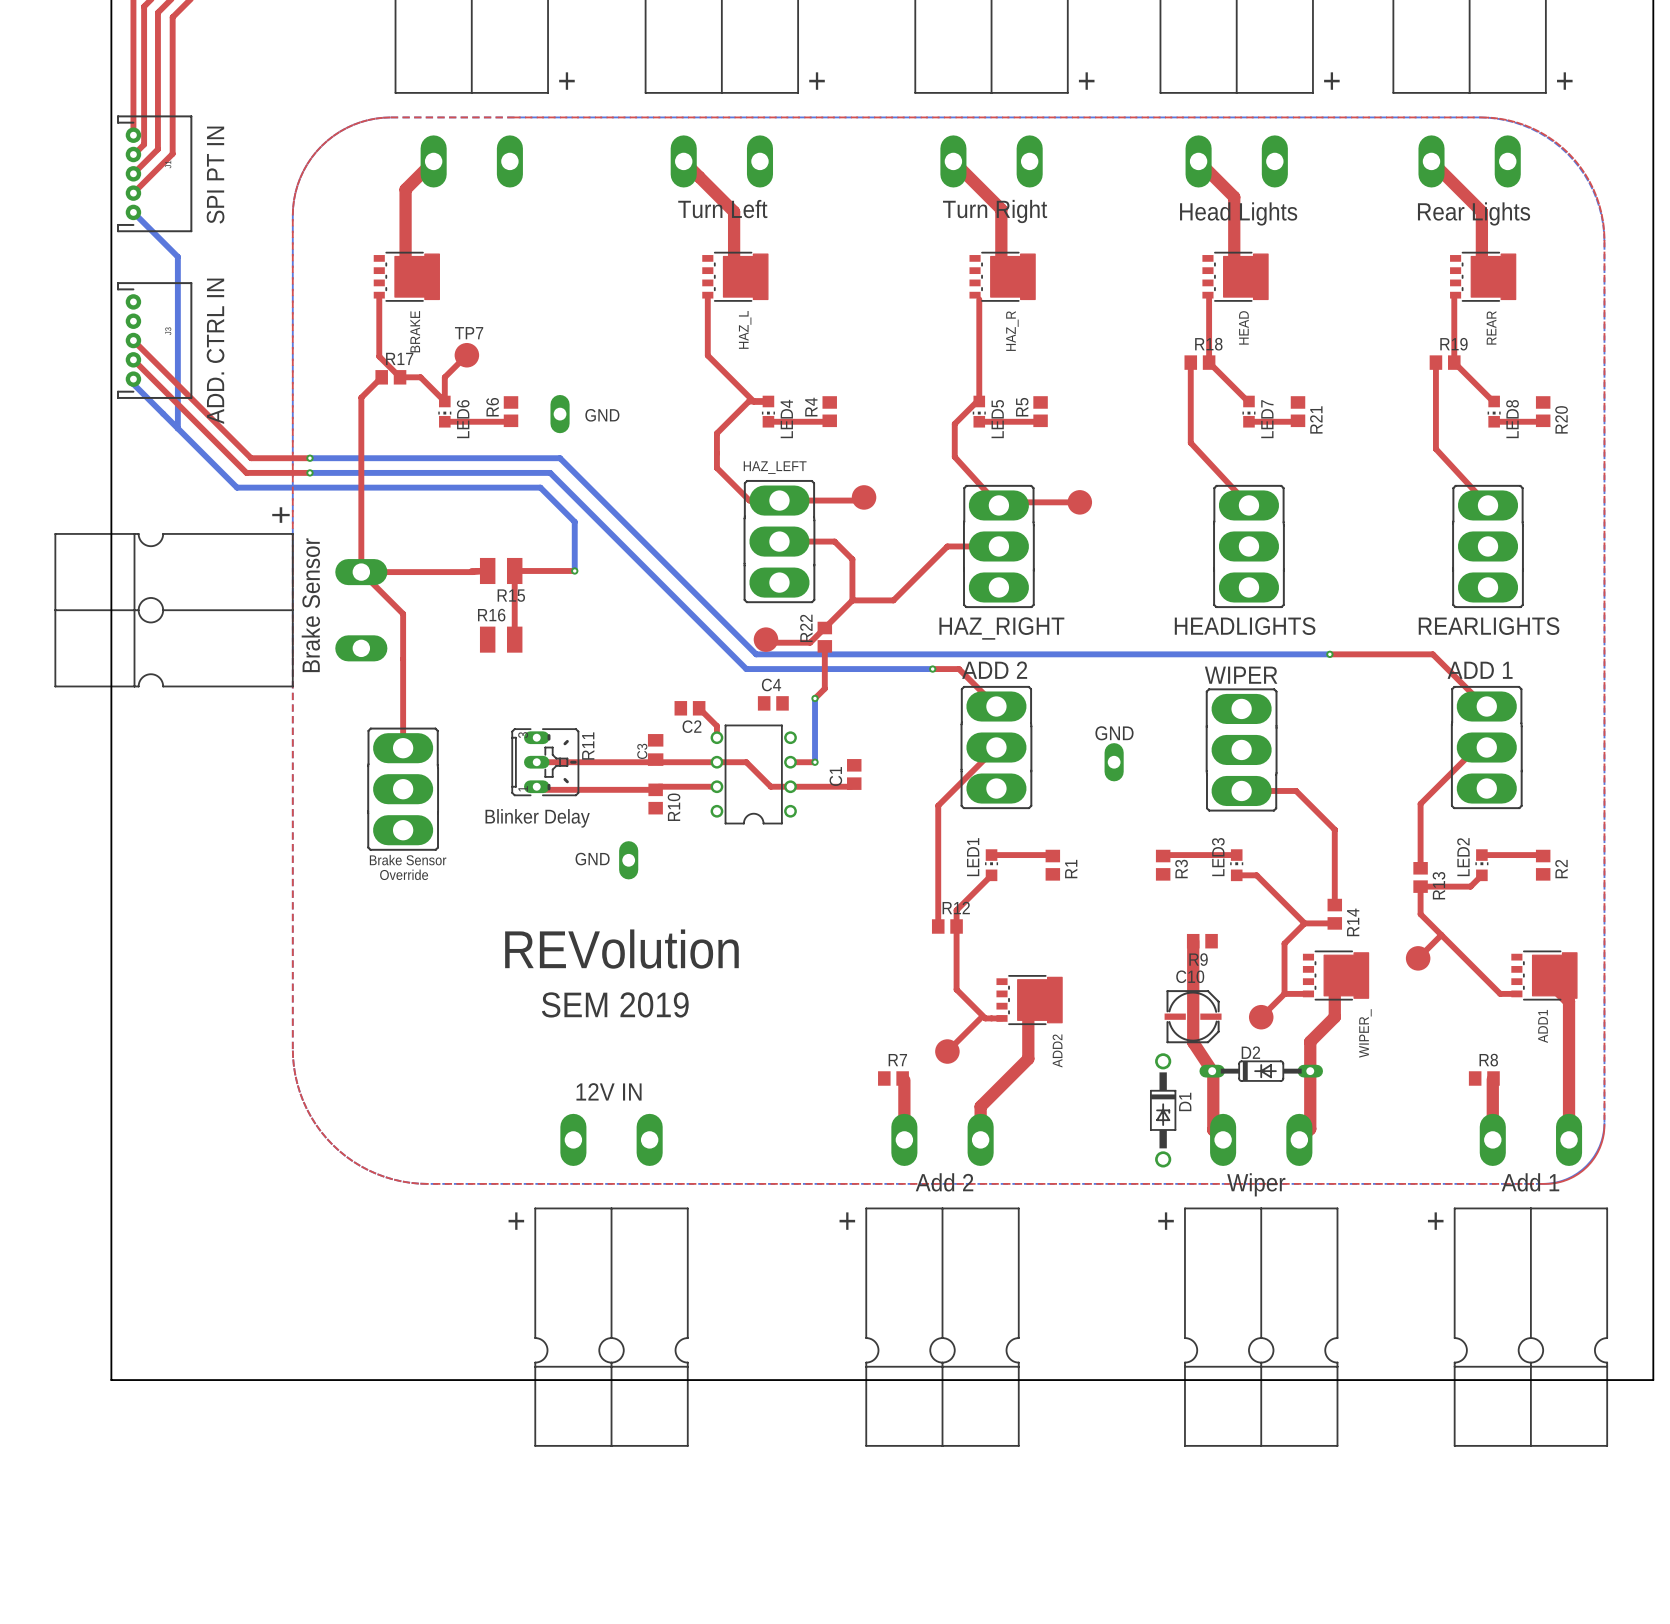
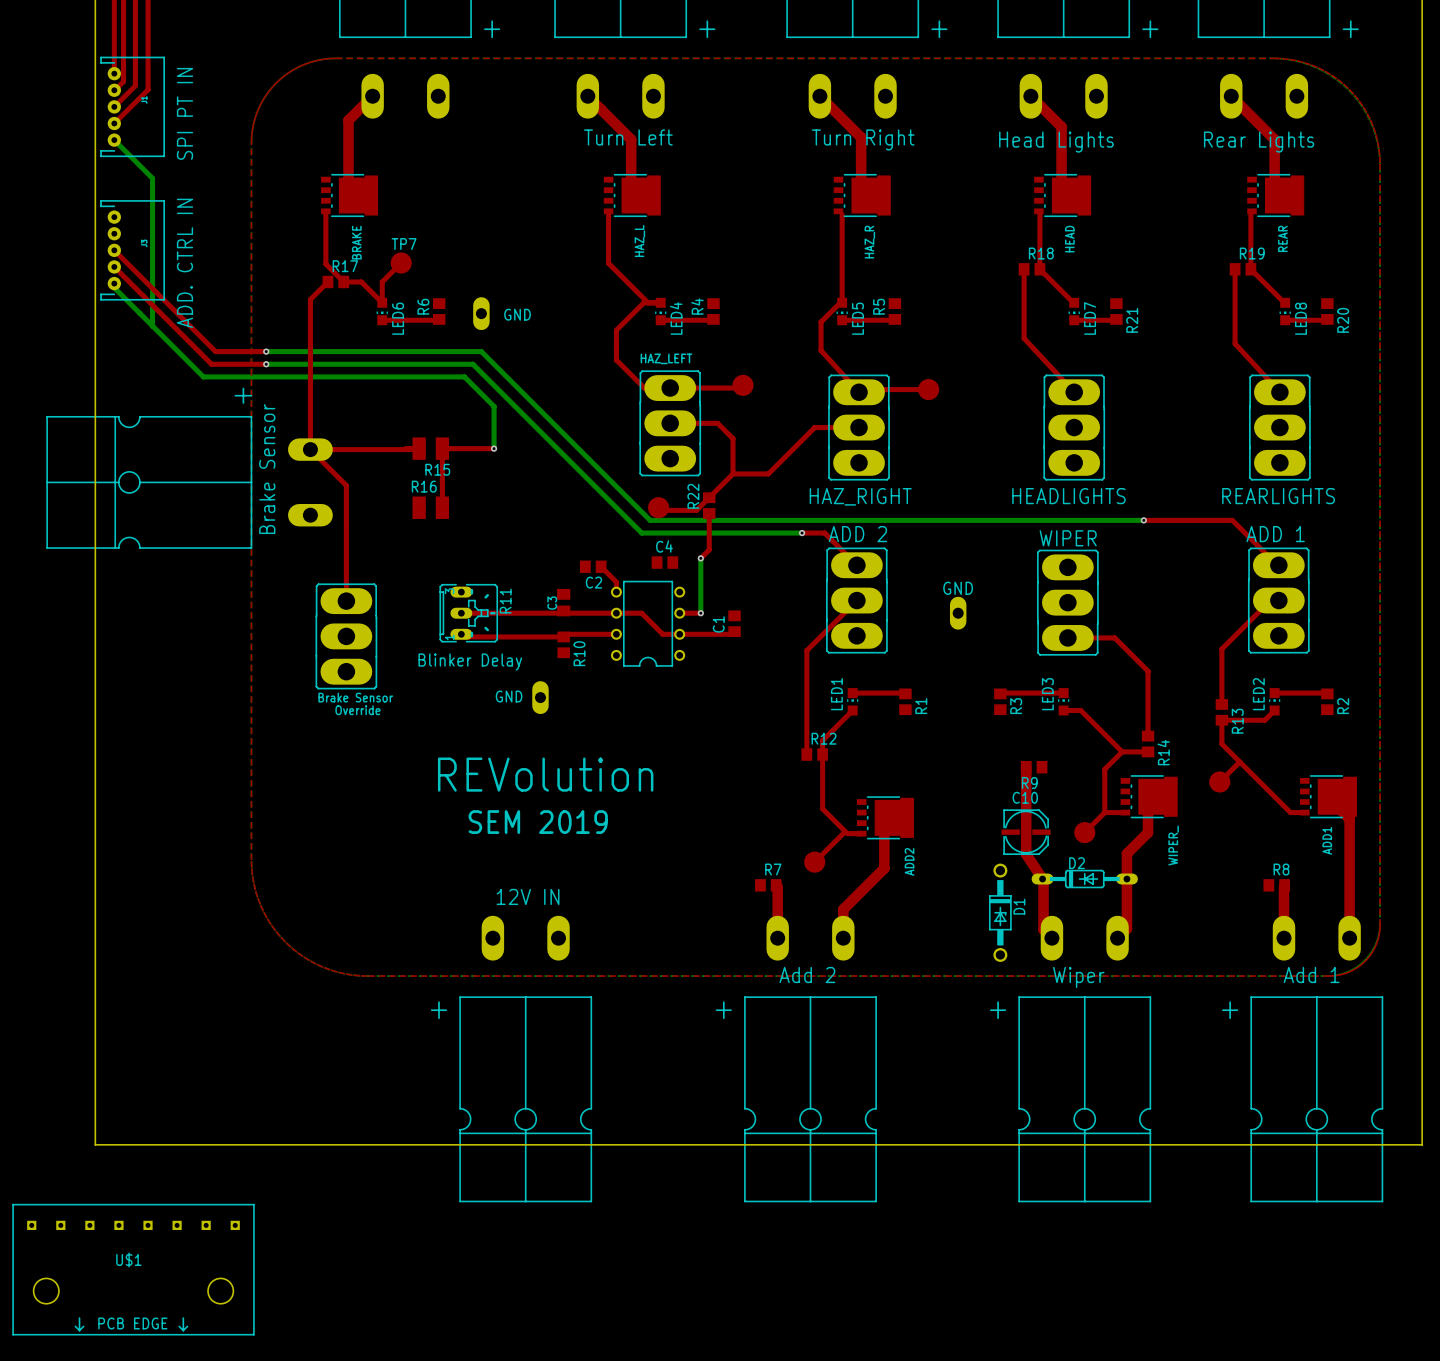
U$1: none -> (133, 1269)

